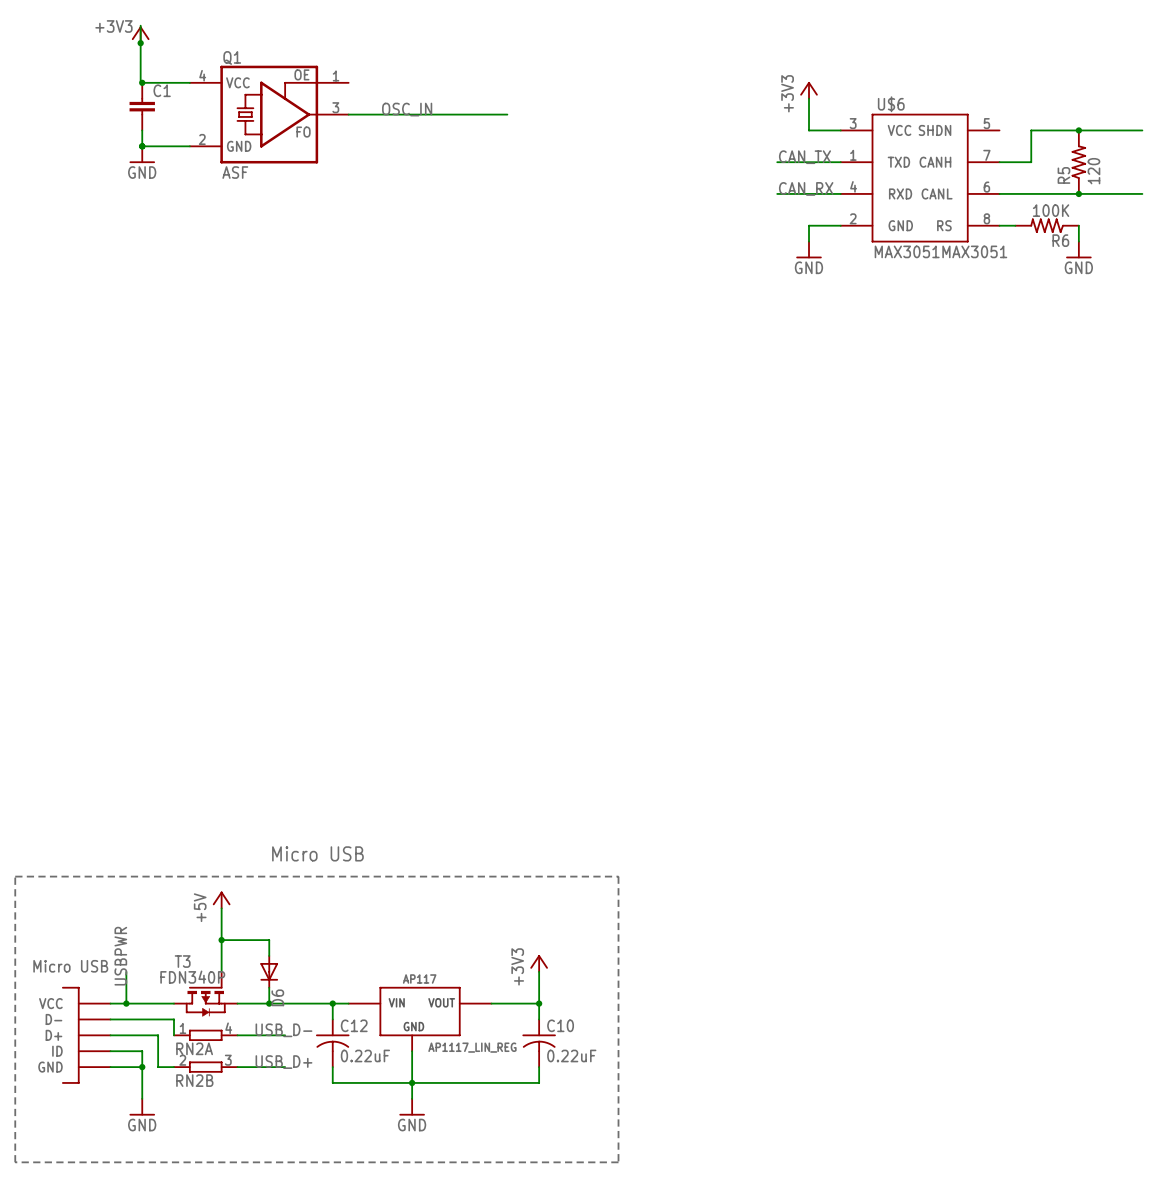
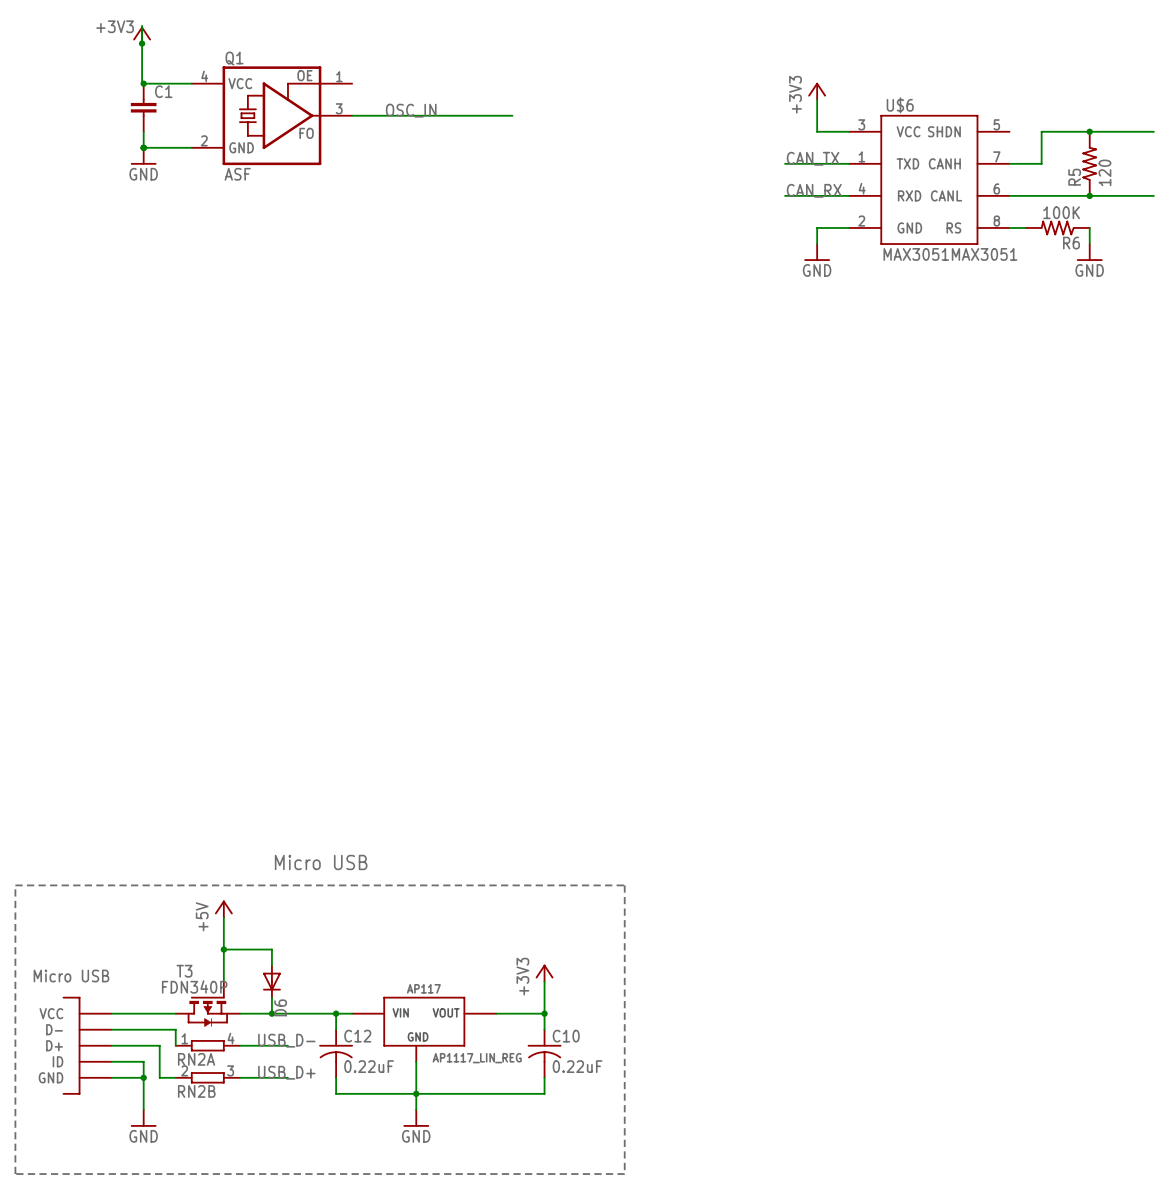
label: USBPWR (120, 956) -> none
wire: (126, 971) (126, 1003) -> none
junction: (126, 1003) -> none

